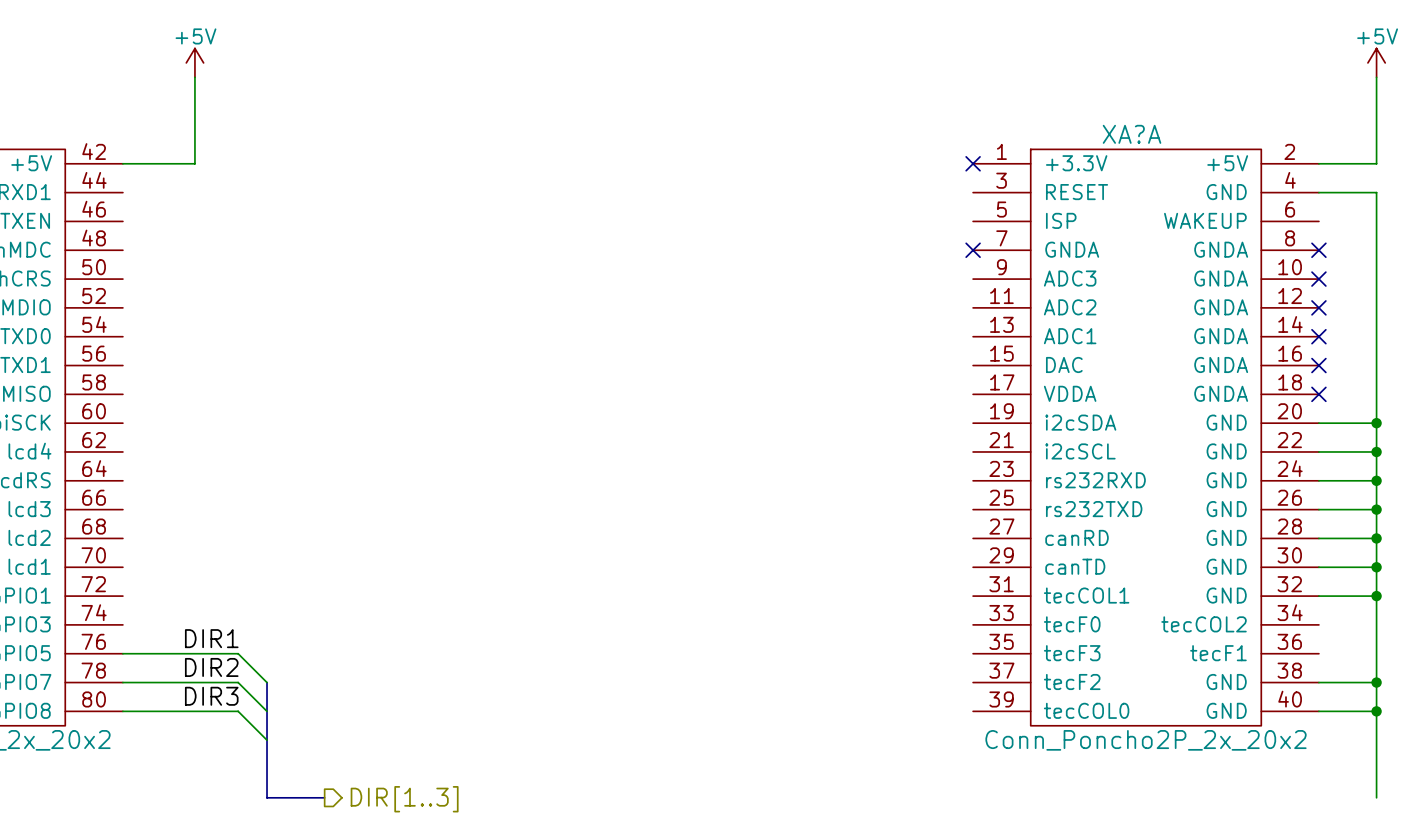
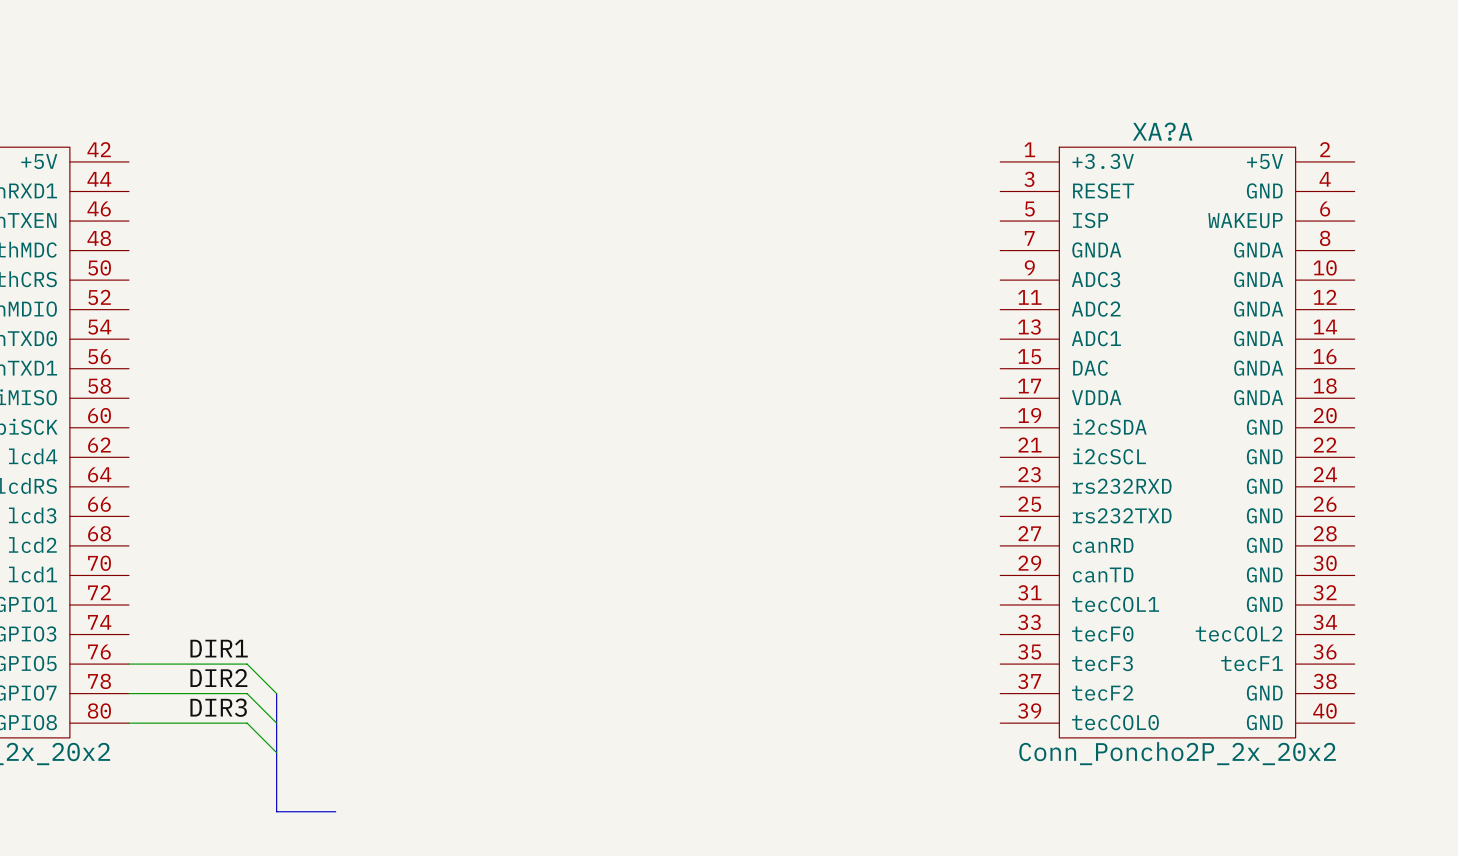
power symbol: +5V (194, 62) -> none
power symbol: +5V (1376, 62) -> none
wire: (194, 77) (194, 163) (122, 163) -> none
wire: (1376, 77) (1376, 163) (1318, 163) -> none
no-connect mark: (973, 163) -> none
wire: (1318, 192) (1376, 192) (1376, 797) -> none
no-connect mark: (973, 250) -> none
no-connect mark: (1318, 250) -> none
no-connect mark: (1318, 279) -> none
no-connect mark: (1318, 307) -> none
no-connect mark: (1318, 336) -> none
no-connect mark: (1318, 365) -> none
no-connect mark: (1318, 394) -> none
wire: (1318, 423) (1376, 423) -> none
junction: (1376, 423) -> none
wire: (1318, 451) (1376, 451) -> none
junction: (1376, 451) -> none
wire: (1318, 480) (1376, 480) -> none
junction: (1376, 480) -> none
wire: (1318, 509) (1376, 509) -> none
junction: (1376, 509) -> none
wire: (1318, 538) (1376, 538) -> none
junction: (1376, 538) -> none
wire: (1318, 567) (1376, 567) -> none
junction: (1376, 567) -> none
wire: (1318, 596) (1376, 596) -> none
junction: (1376, 596) -> none
wire: (1318, 682) (1376, 682) -> none
junction: (1376, 682) -> none
wire: (1318, 711) (1376, 711) -> none
junction: (1376, 711) -> none
hierarchical label: DIR[1..3] (404, 799) -> none

